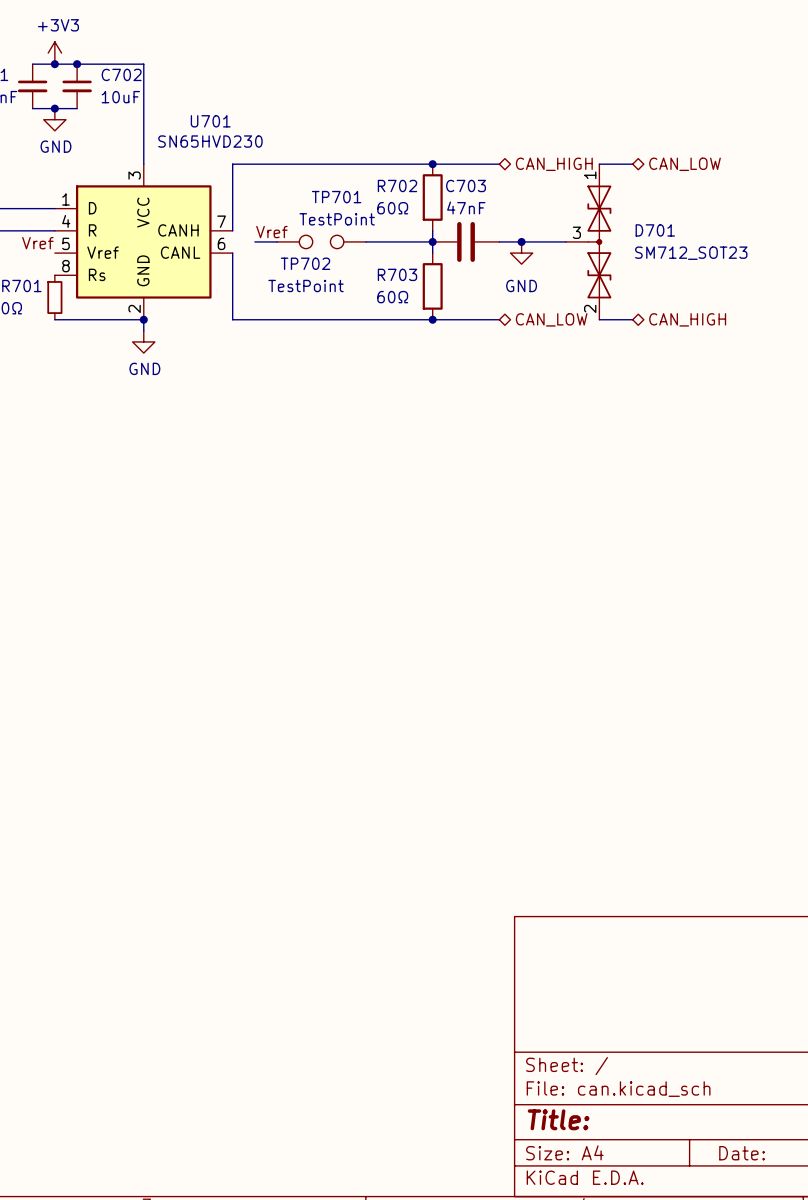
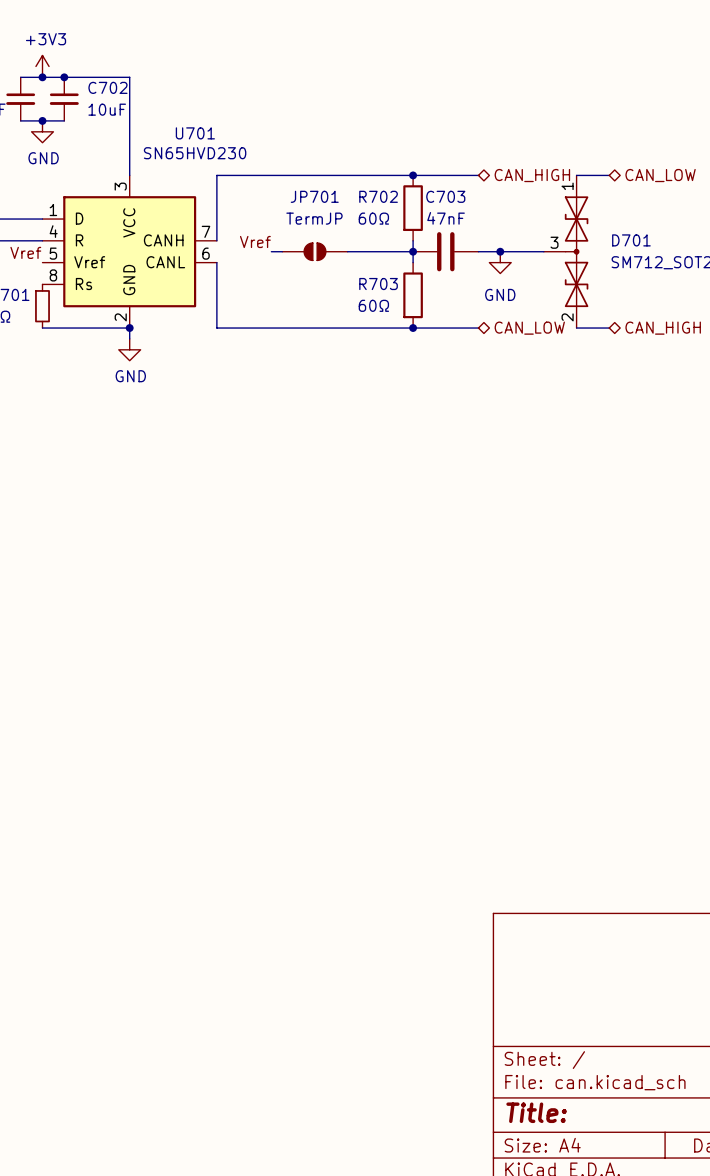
wire: (254, 241) (277, 241) -> none
TP702: TestPoint (294, 241) -> none
JP701: none -> TermJP (314, 251)
TP701: TestPoint (348, 241) -> none

